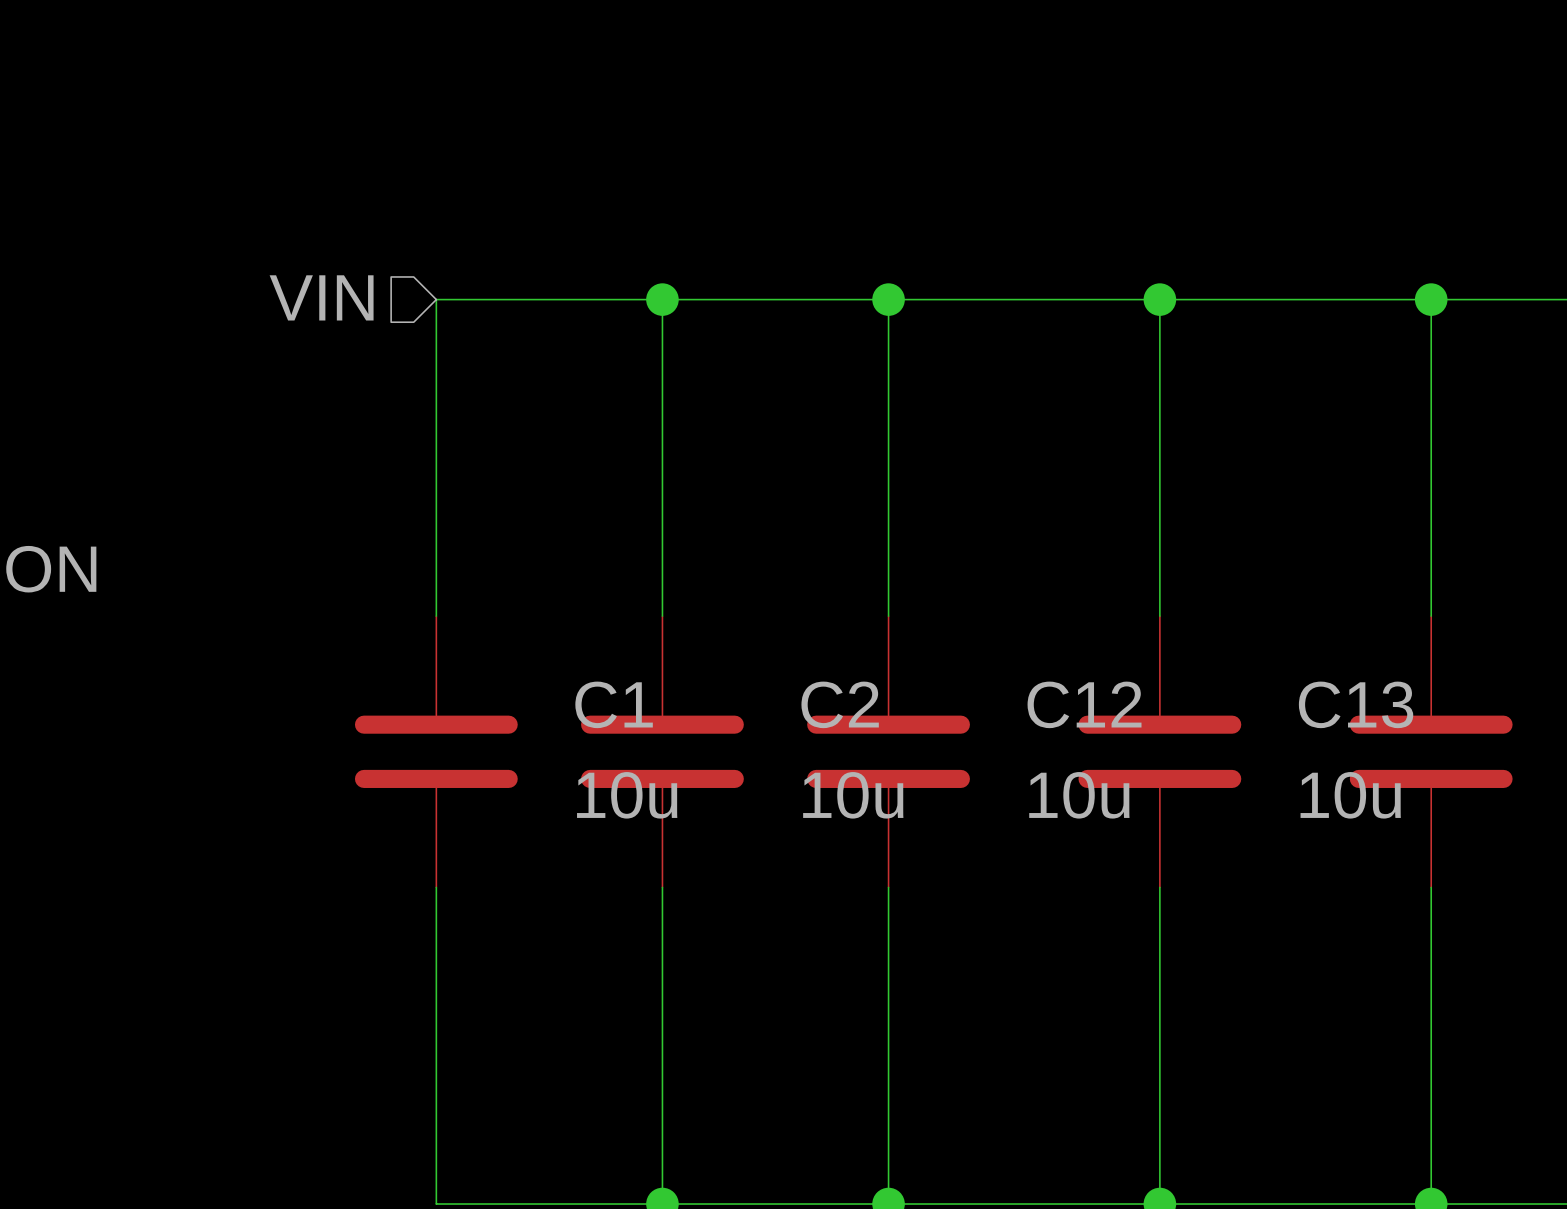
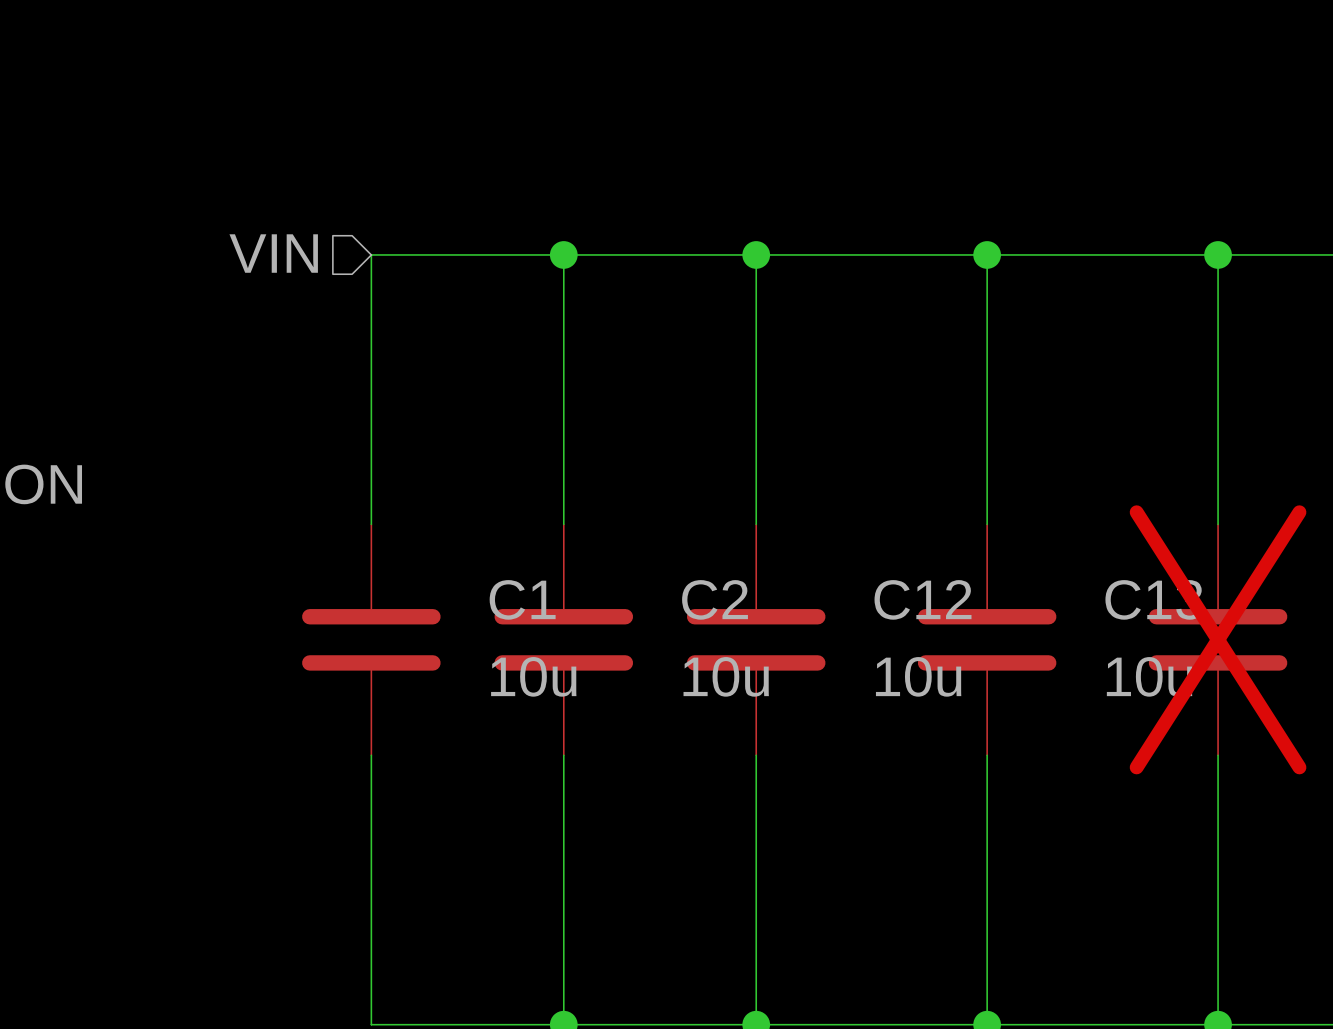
part do-not-place cross: none -> (1218, 639)

